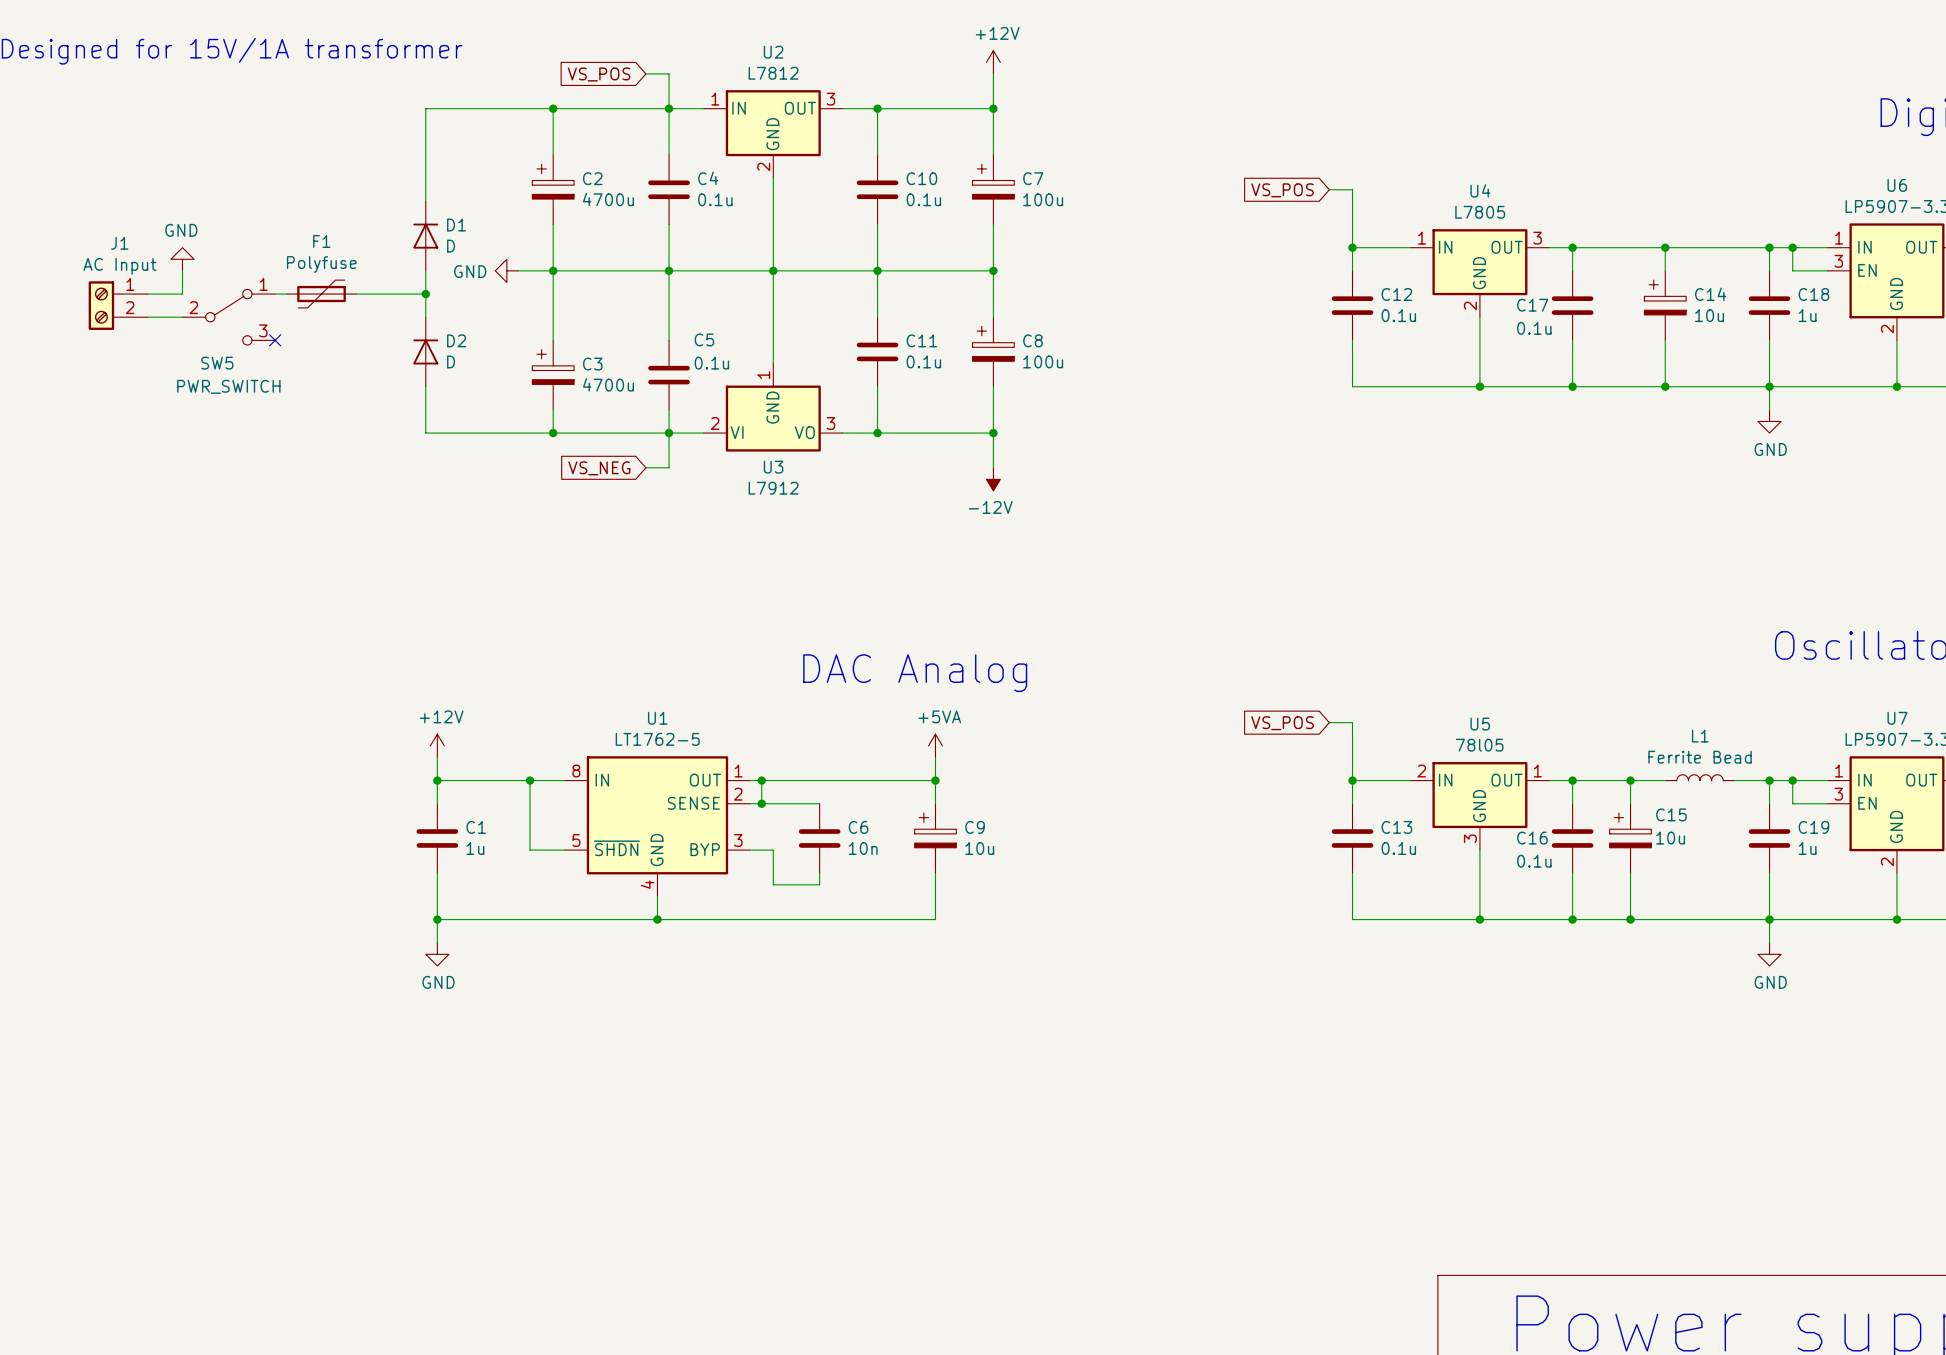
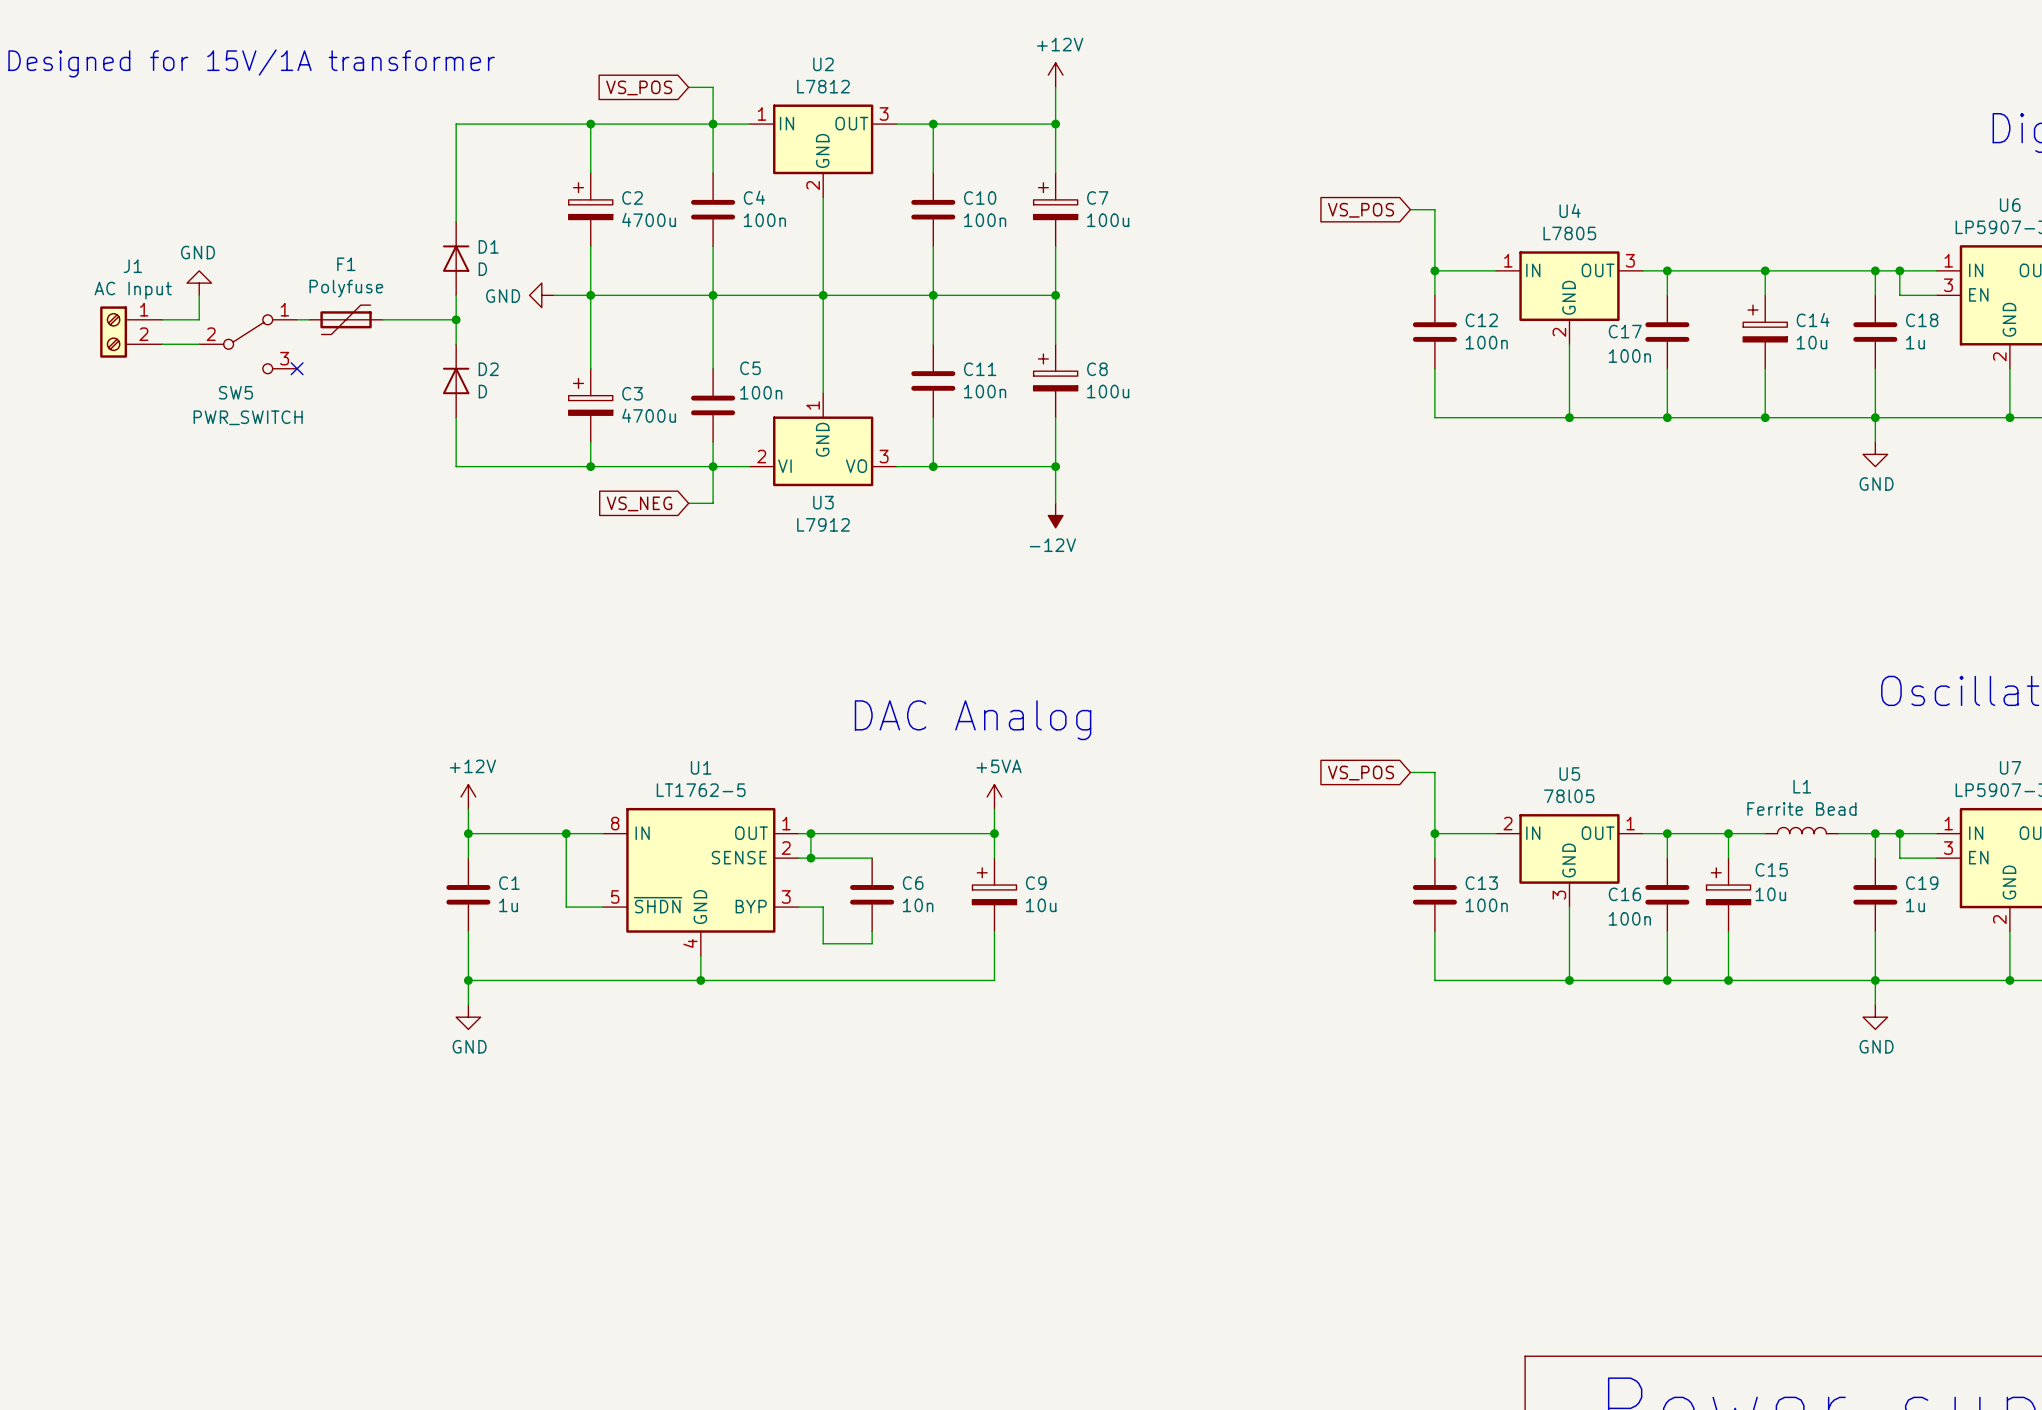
C4 value: 0.1u (715, 199) -> 100n (764, 220)
C10 value: 0.1u (923, 199) -> 100n (985, 220)
C12 value: 0.1u (1398, 315) -> 100n (1486, 342)
C17 value: 0.1u (1534, 328) -> 100n (1629, 356)
C11 value: 0.1u (923, 361) -> 100n (985, 391)
C5 value: 0.1u (711, 363) -> 100n (761, 392)
C13 value: 0.1u (1398, 848) -> 100n (1486, 905)
C16 value: 0.1u (1534, 861) -> 100n (1629, 918)

